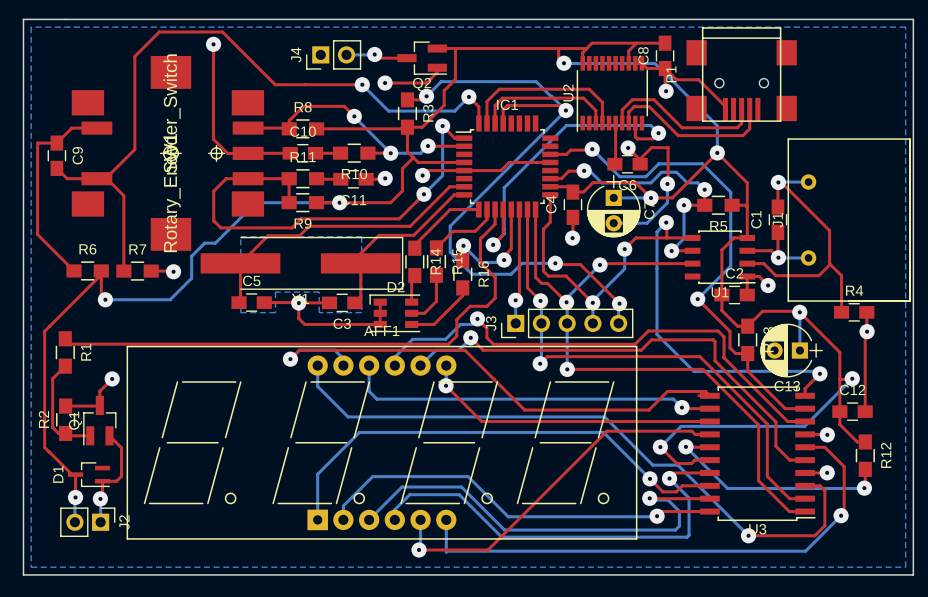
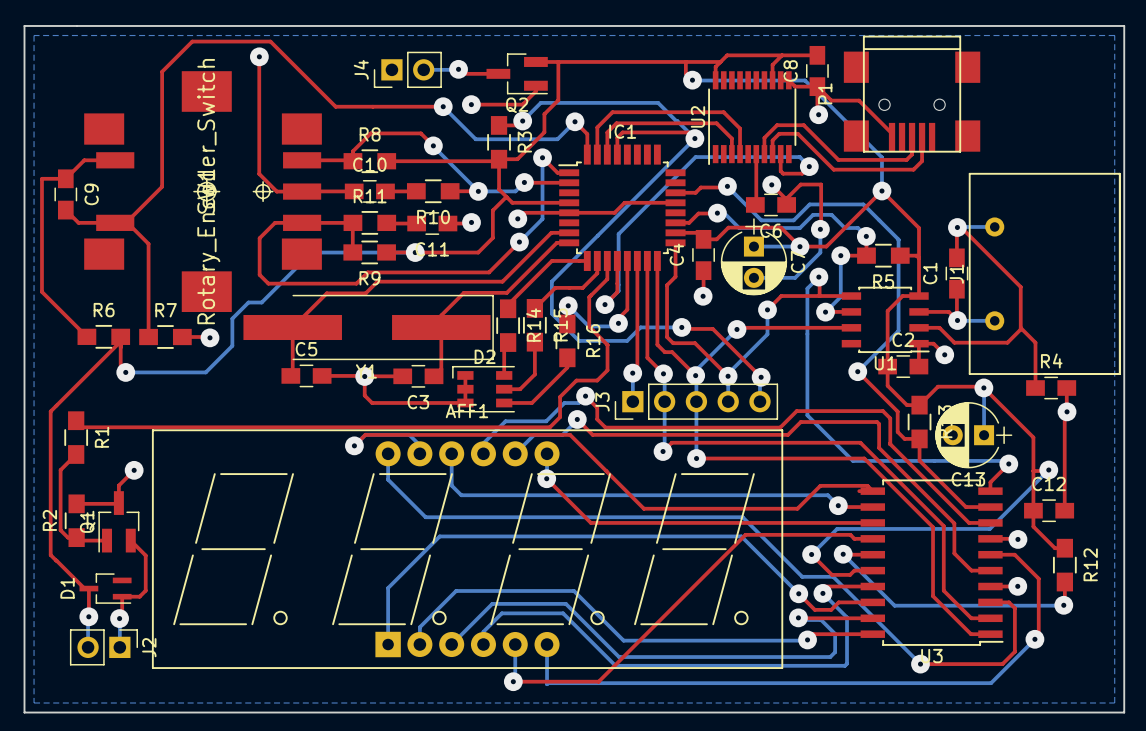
bottom zone outline: (240, 236) (361, 236) (361, 312) (319, 312) (319, 292) (275, 292) (275, 312) (240, 312) (240, 236) -> none

